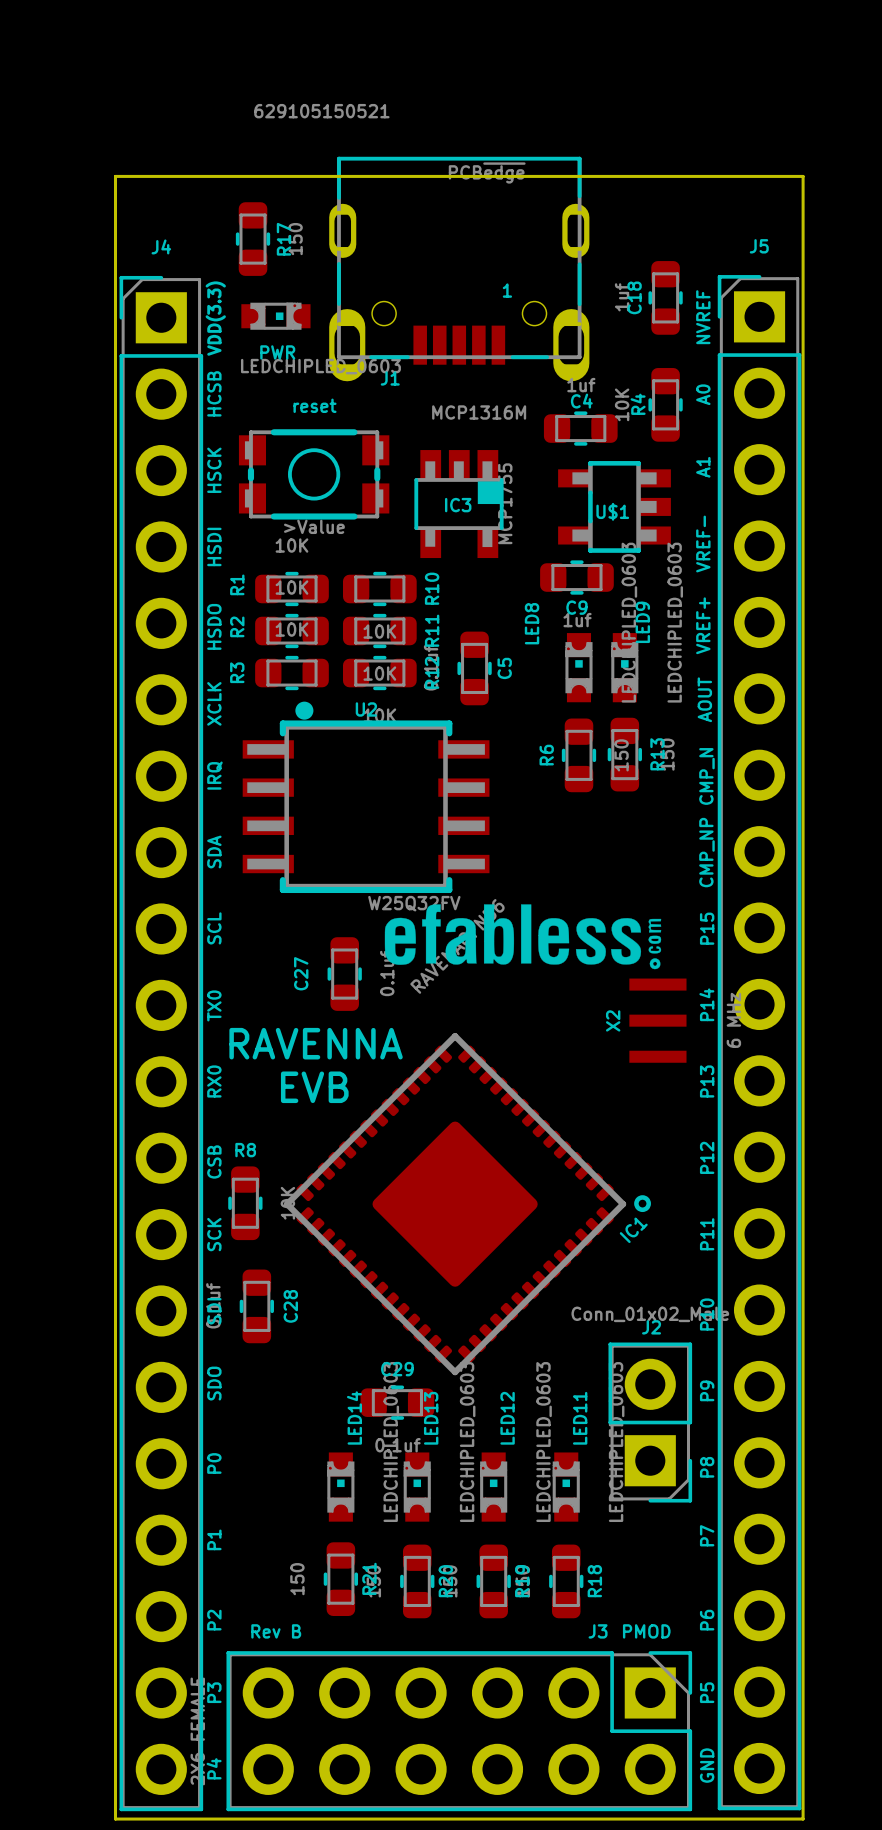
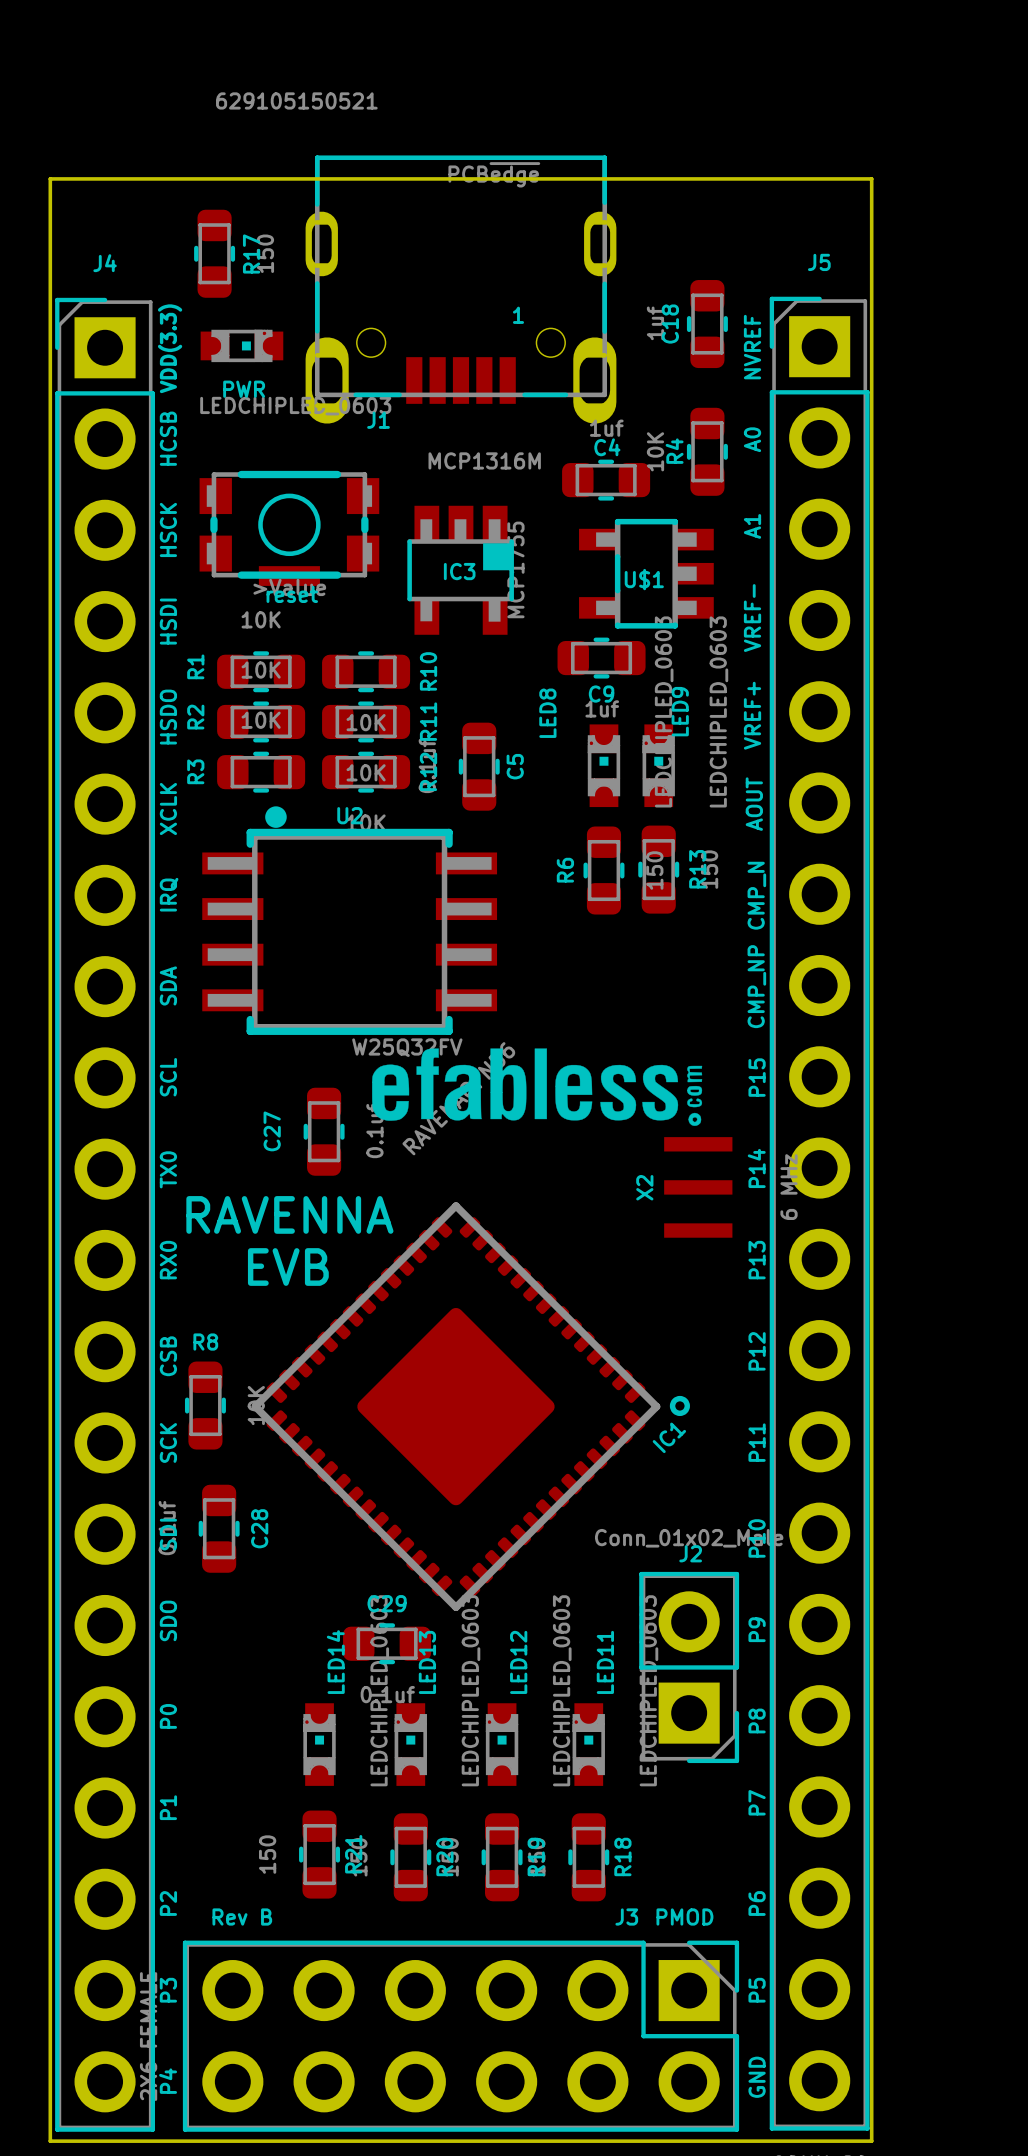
part footprint: [238, 429, 390, 520] -> [199, 470, 380, 586]

